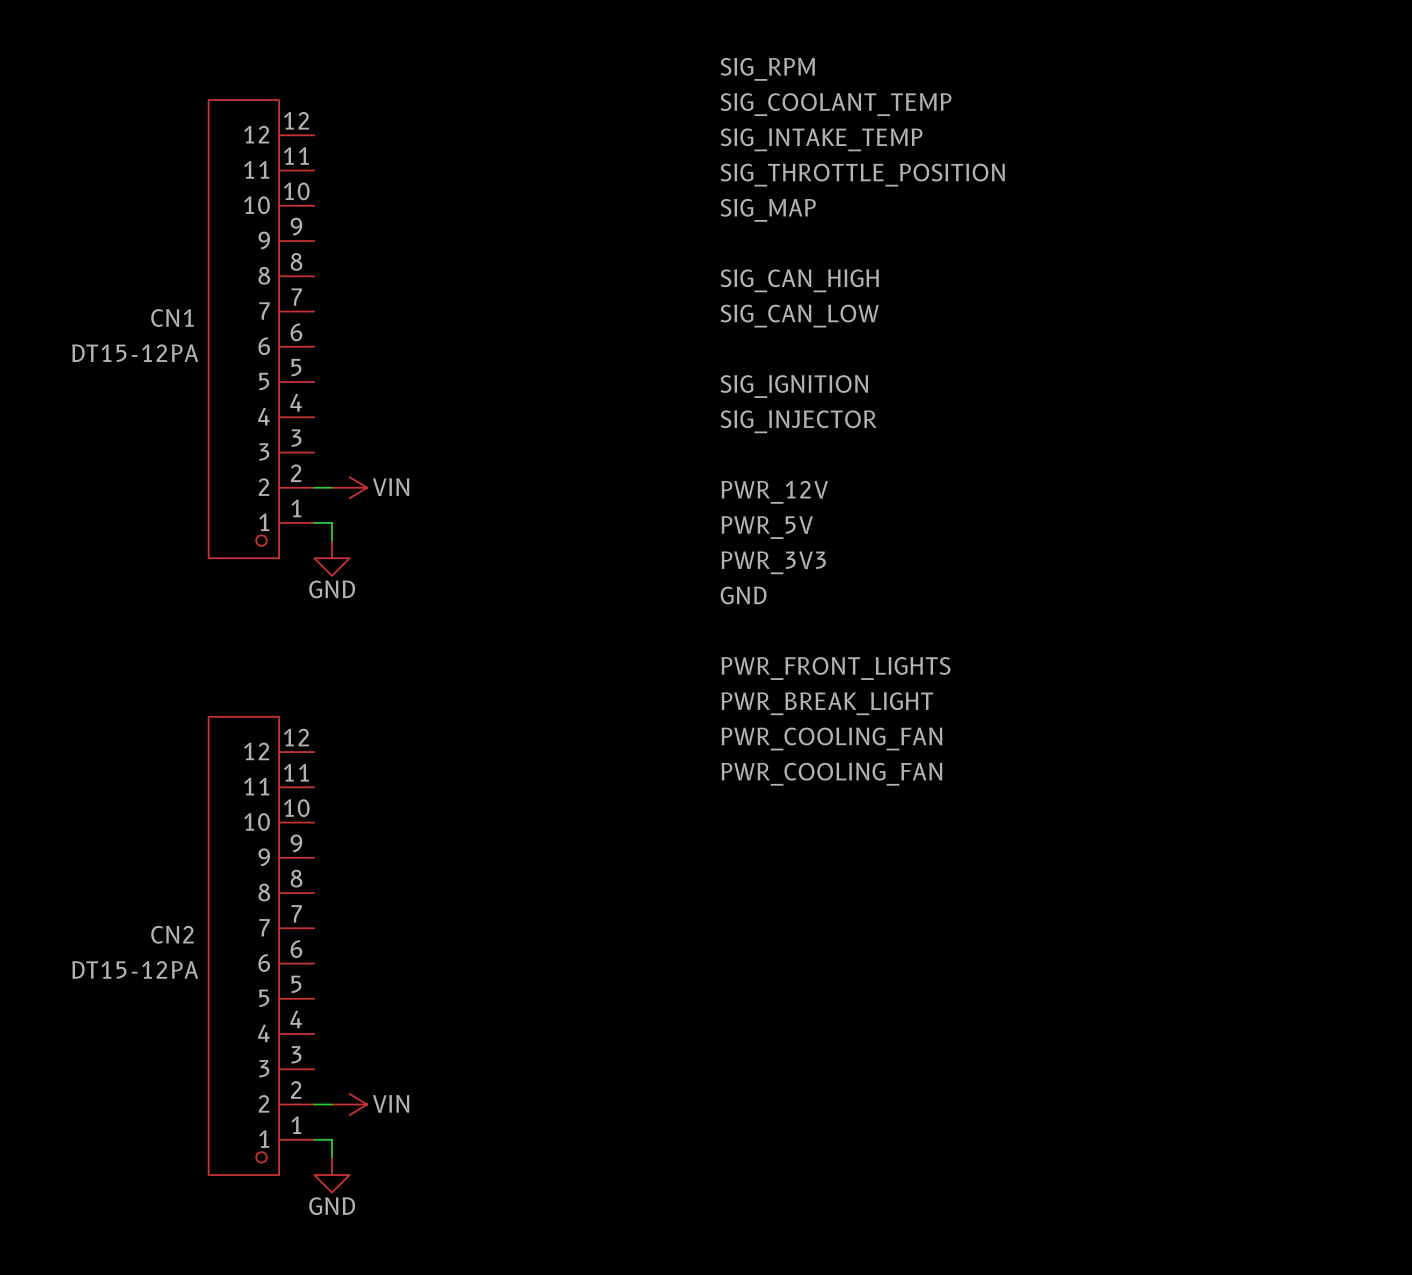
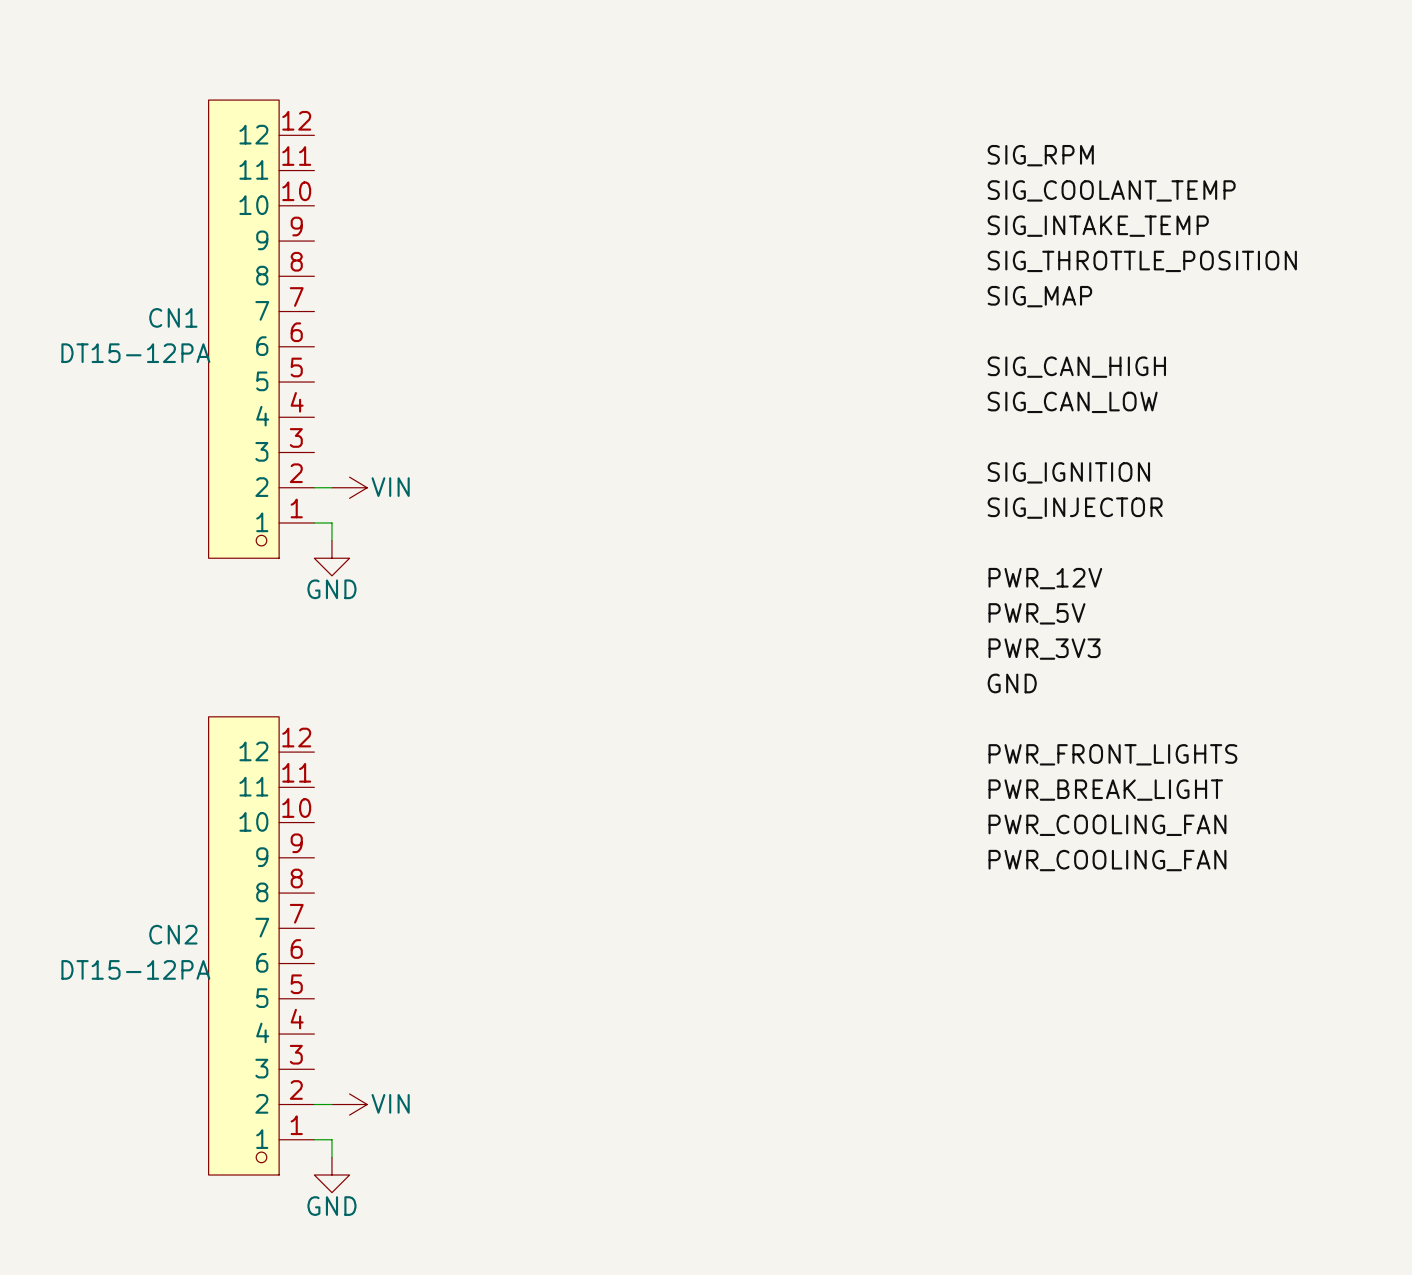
label position: SIG_RPM (767, 69) -> SIG_RPM (1040, 155)
label position: SIG_COOLANT_TEMP (836, 104) -> SIG_COOLANT_TEMP (1111, 190)
label position: SIG_INTAKE_TEMP (821, 139) -> SIG_INTAKE_TEMP (1098, 226)
label position: SIG_THROTTLE_POSITION (862, 175) -> SIG_THROTTLE_POSITION (1142, 261)
label position: SIG_MAP (768, 210) -> SIG_MAP (1039, 296)
label position: SIG_CAN_HIGH (799, 280) -> SIG_CAN_HIGH (1076, 367)
label position: SIG_CAN_LOW (799, 316) -> SIG_CAN_LOW (1072, 402)
label position: SIG_IGNITION (794, 386) -> SIG_IGNITION (1068, 472)
label position: SIG_INJECTOR (798, 421) -> SIG_INJECTOR (1075, 508)
label position: PWR_12V (774, 492) -> PWR_12V (1045, 578)
label position: PWR_5V (767, 527) -> PWR_5V (1036, 613)
label position: PWR_3V3 (773, 562) -> PWR_3V3 (1044, 649)
label position: GND (743, 595) -> GND (1012, 683)
label position: PWR_FRONT_LIGHTS (835, 668) -> PWR_FRONT_LIGHTS (1112, 754)
label position: PWR_BREAK_LIGHT (827, 703) -> PWR_BREAK_LIGHT (1105, 790)
label: PWR_COOLING_FAN (831, 738) -> none
label: PWR_COOLING_FAN (831, 774) -> none
label: none -> PWR_COOLING_FAN (1107, 825)
label: none -> PWR_COOLING_FAN (1107, 860)

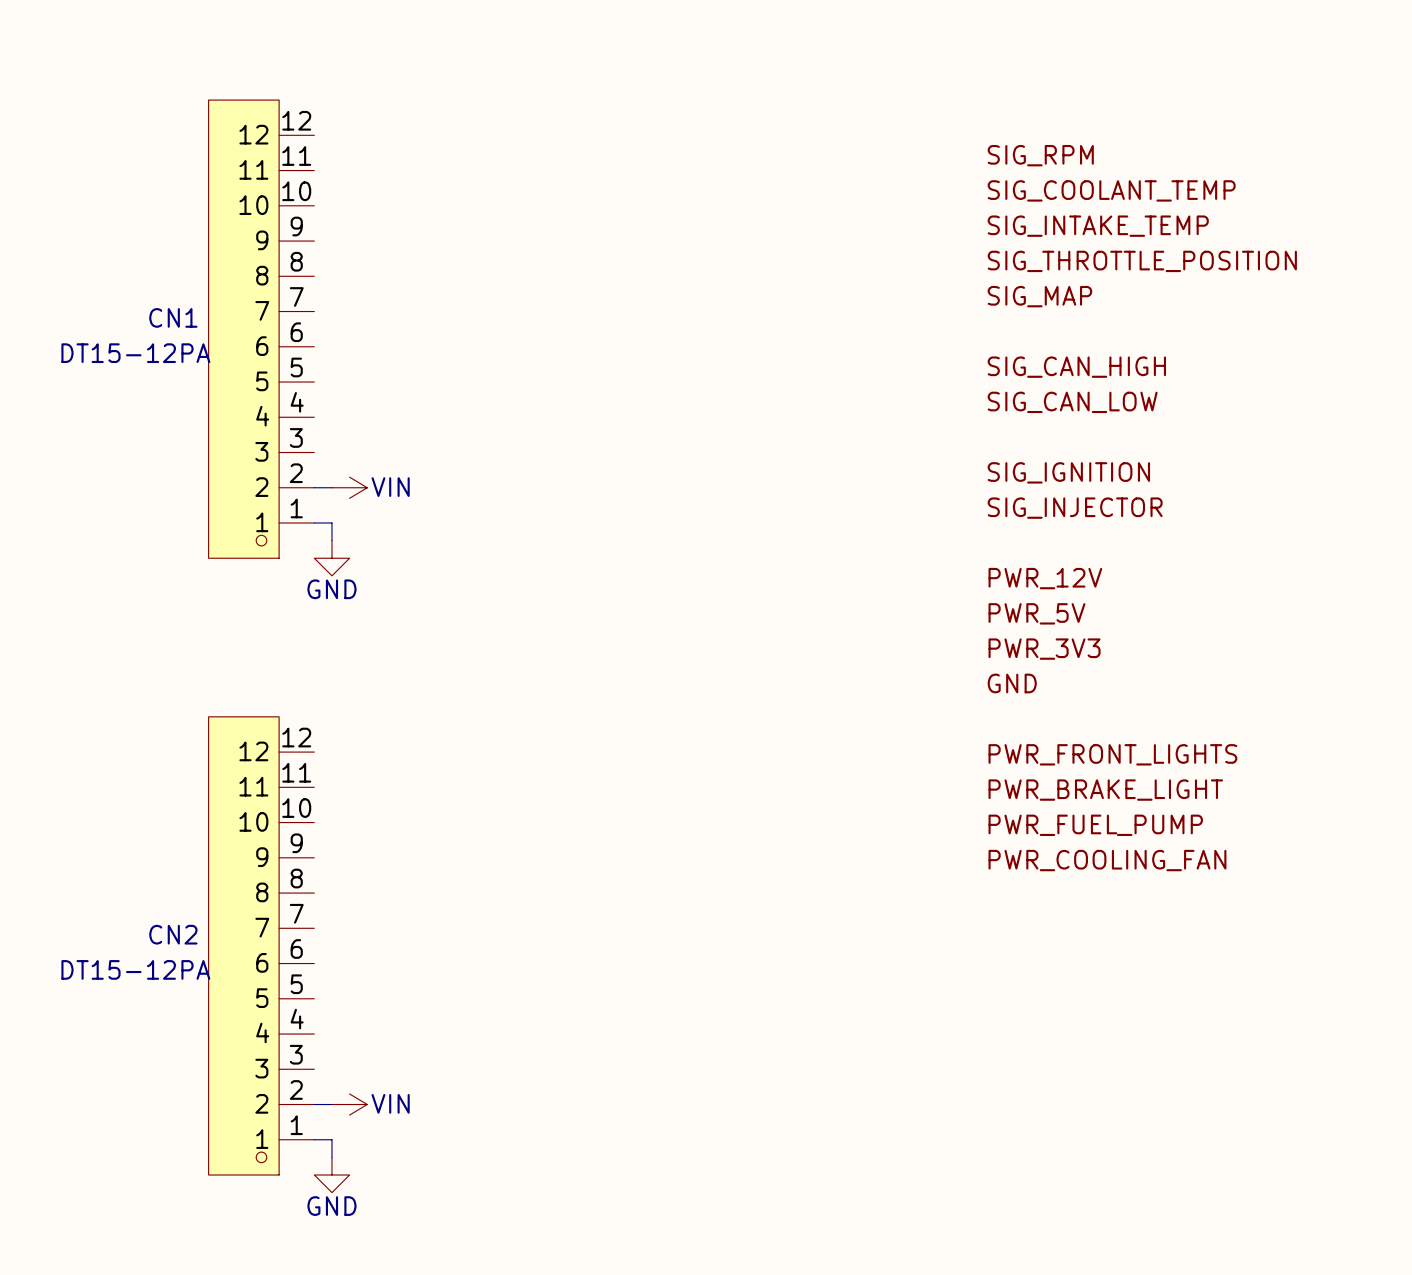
label: PWR_BREAK_LIGHT (1105, 790) -> PWR_BRAKE_LIGHT (1105, 790)
label: PWR_COOLING_FAN (1107, 825) -> PWR_FUEL_PUMP (1095, 825)

